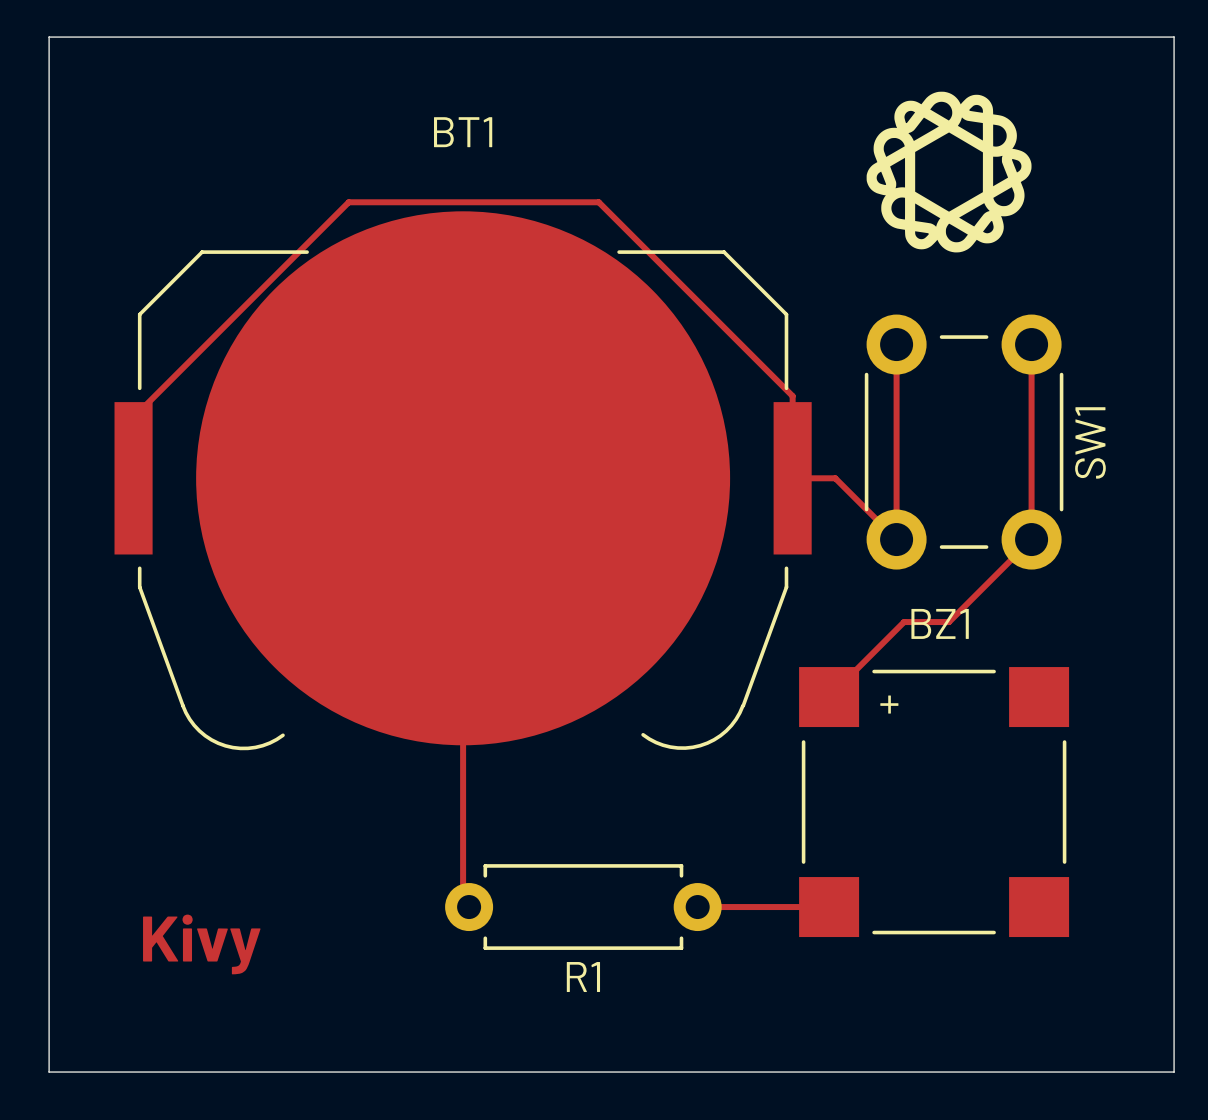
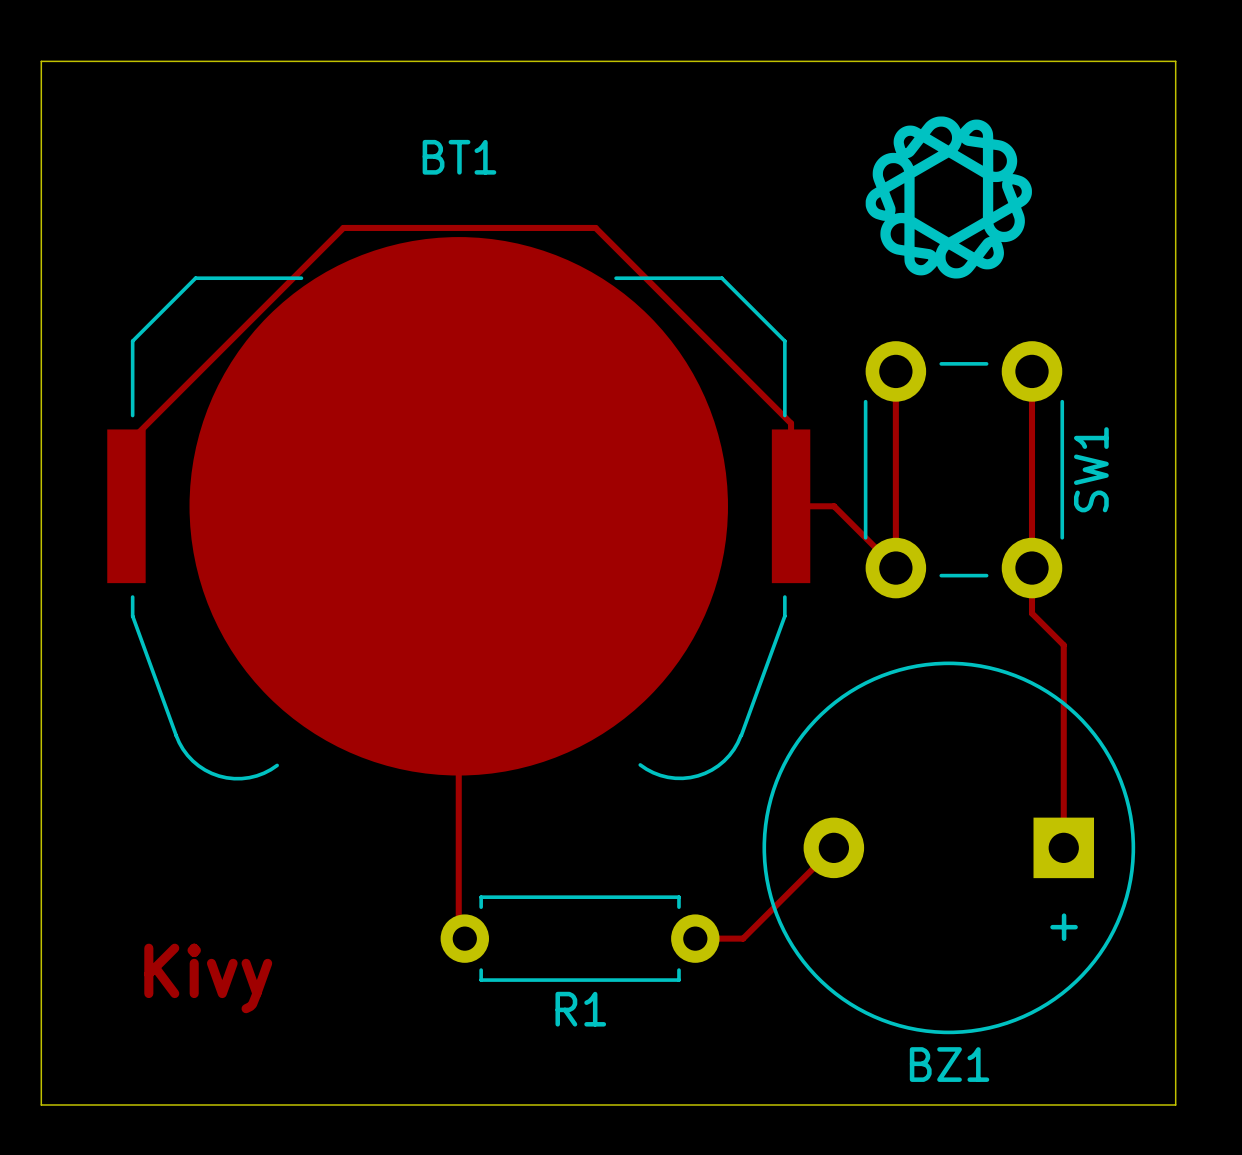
track: (1031, 539) (949, 622) (904, 622) (829, 697) -> (1032, 568) (1032, 613) (1063, 645) (1063, 847)
BZ1 name position: BZ1 (940, 623) -> BZ1 (949, 1064)
BZ1 footprint: [799, 667, 1070, 938] -> [762, 661, 1136, 1035]
track: (745, 907) (829, 907) -> (743, 938) (833, 847)

